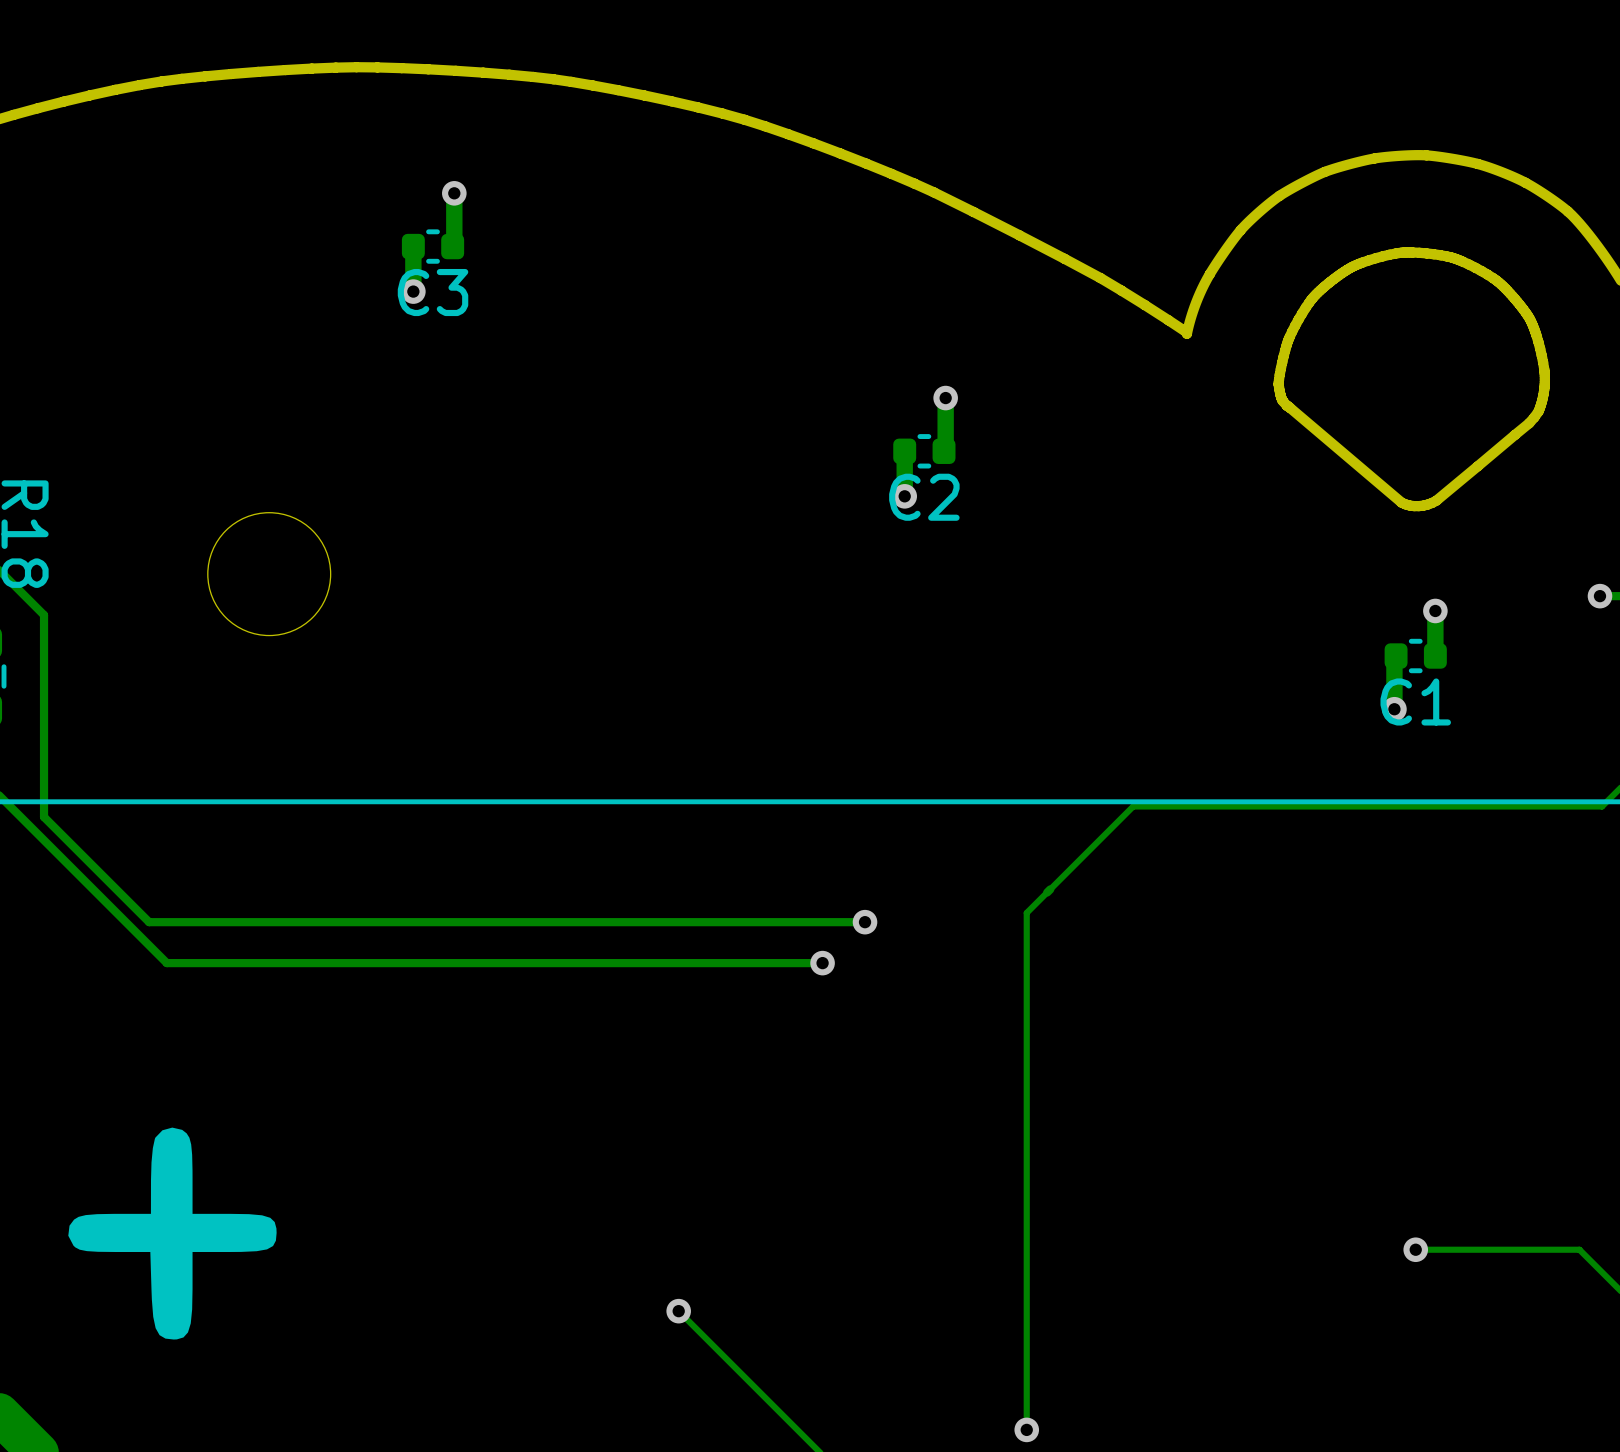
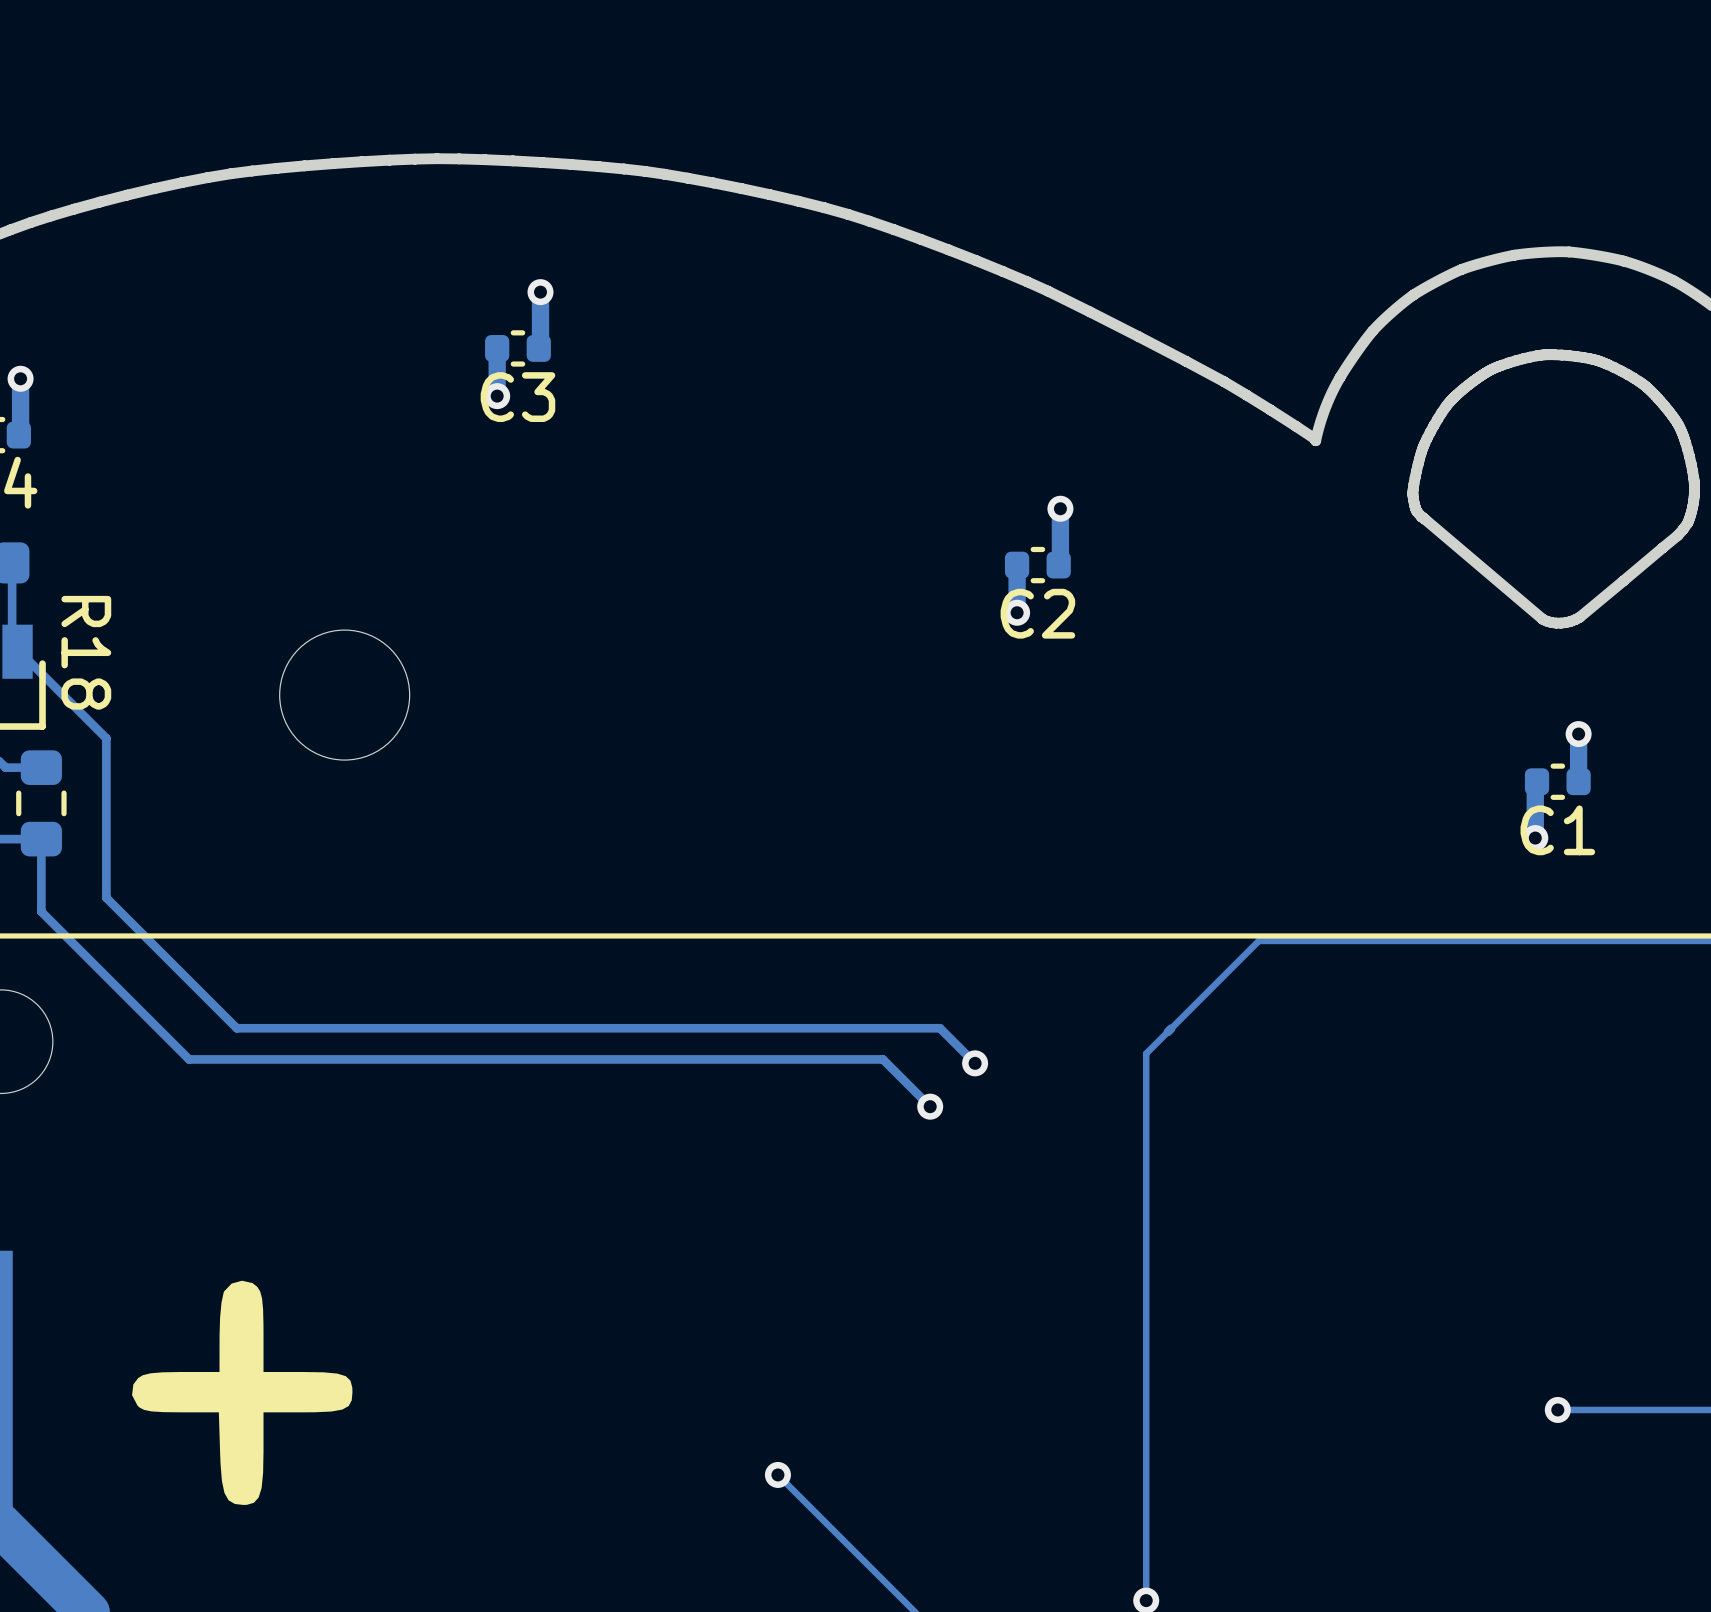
track: (44, 765) (44, 817) (149, 922) (865, 922) -> (106, 897) (236, 1028) (940, 1028) (975, 1063)
track: (122, 918) (166, 963) (822, 963) -> (189, 1059) (882, 1059) (930, 1106)

